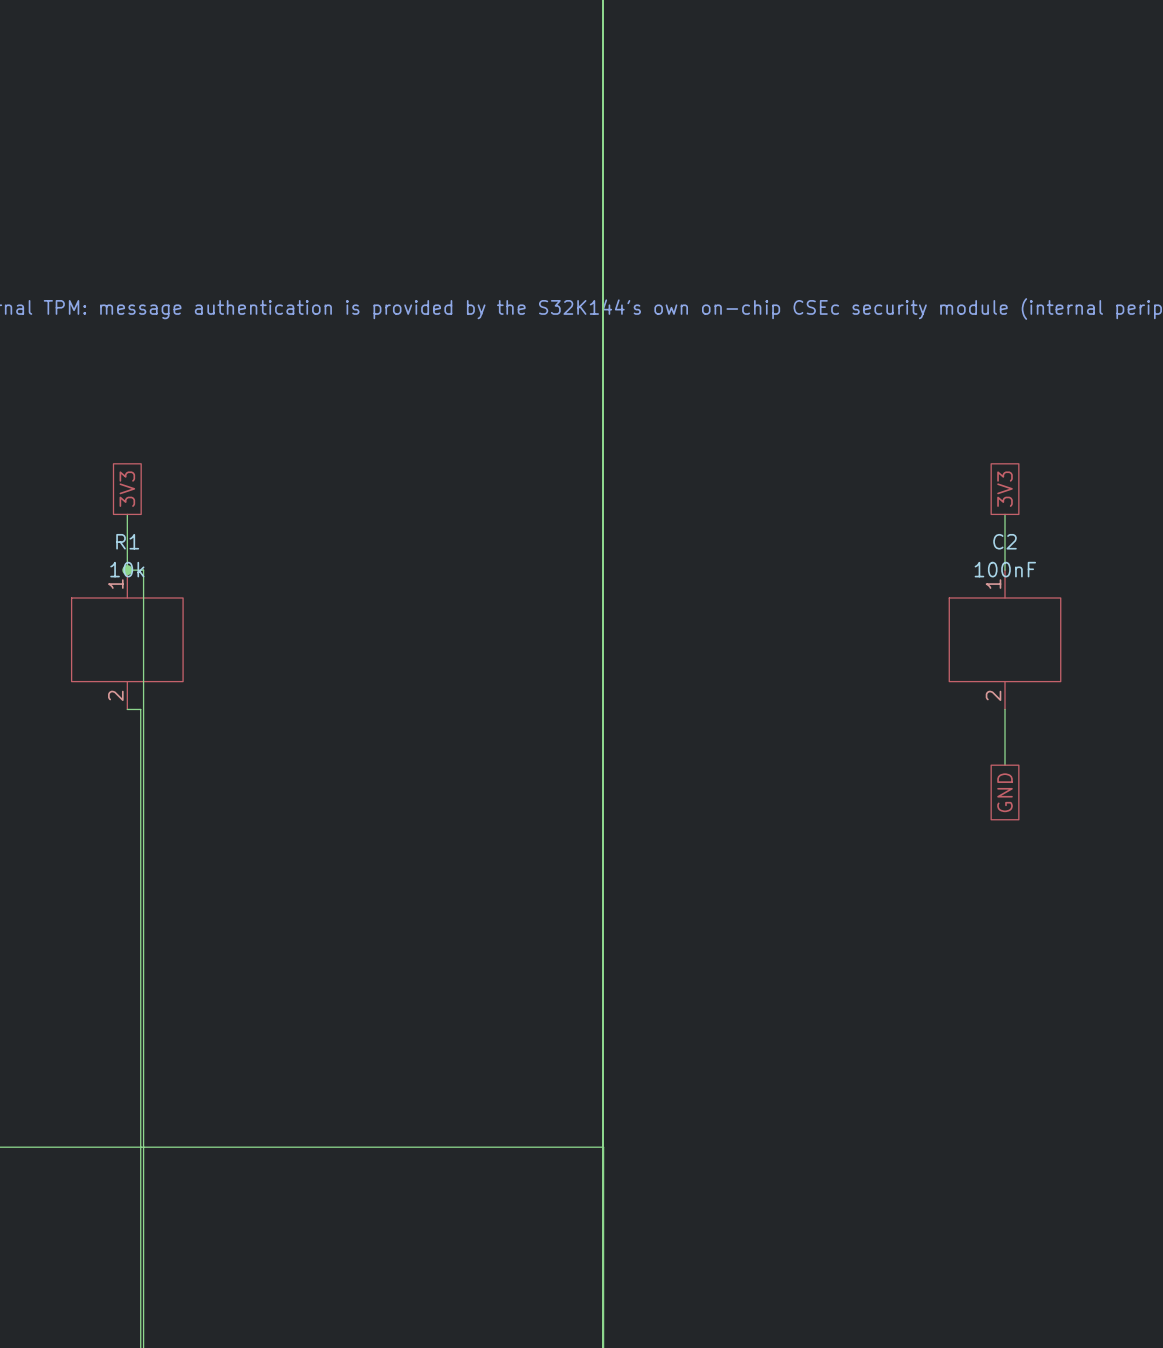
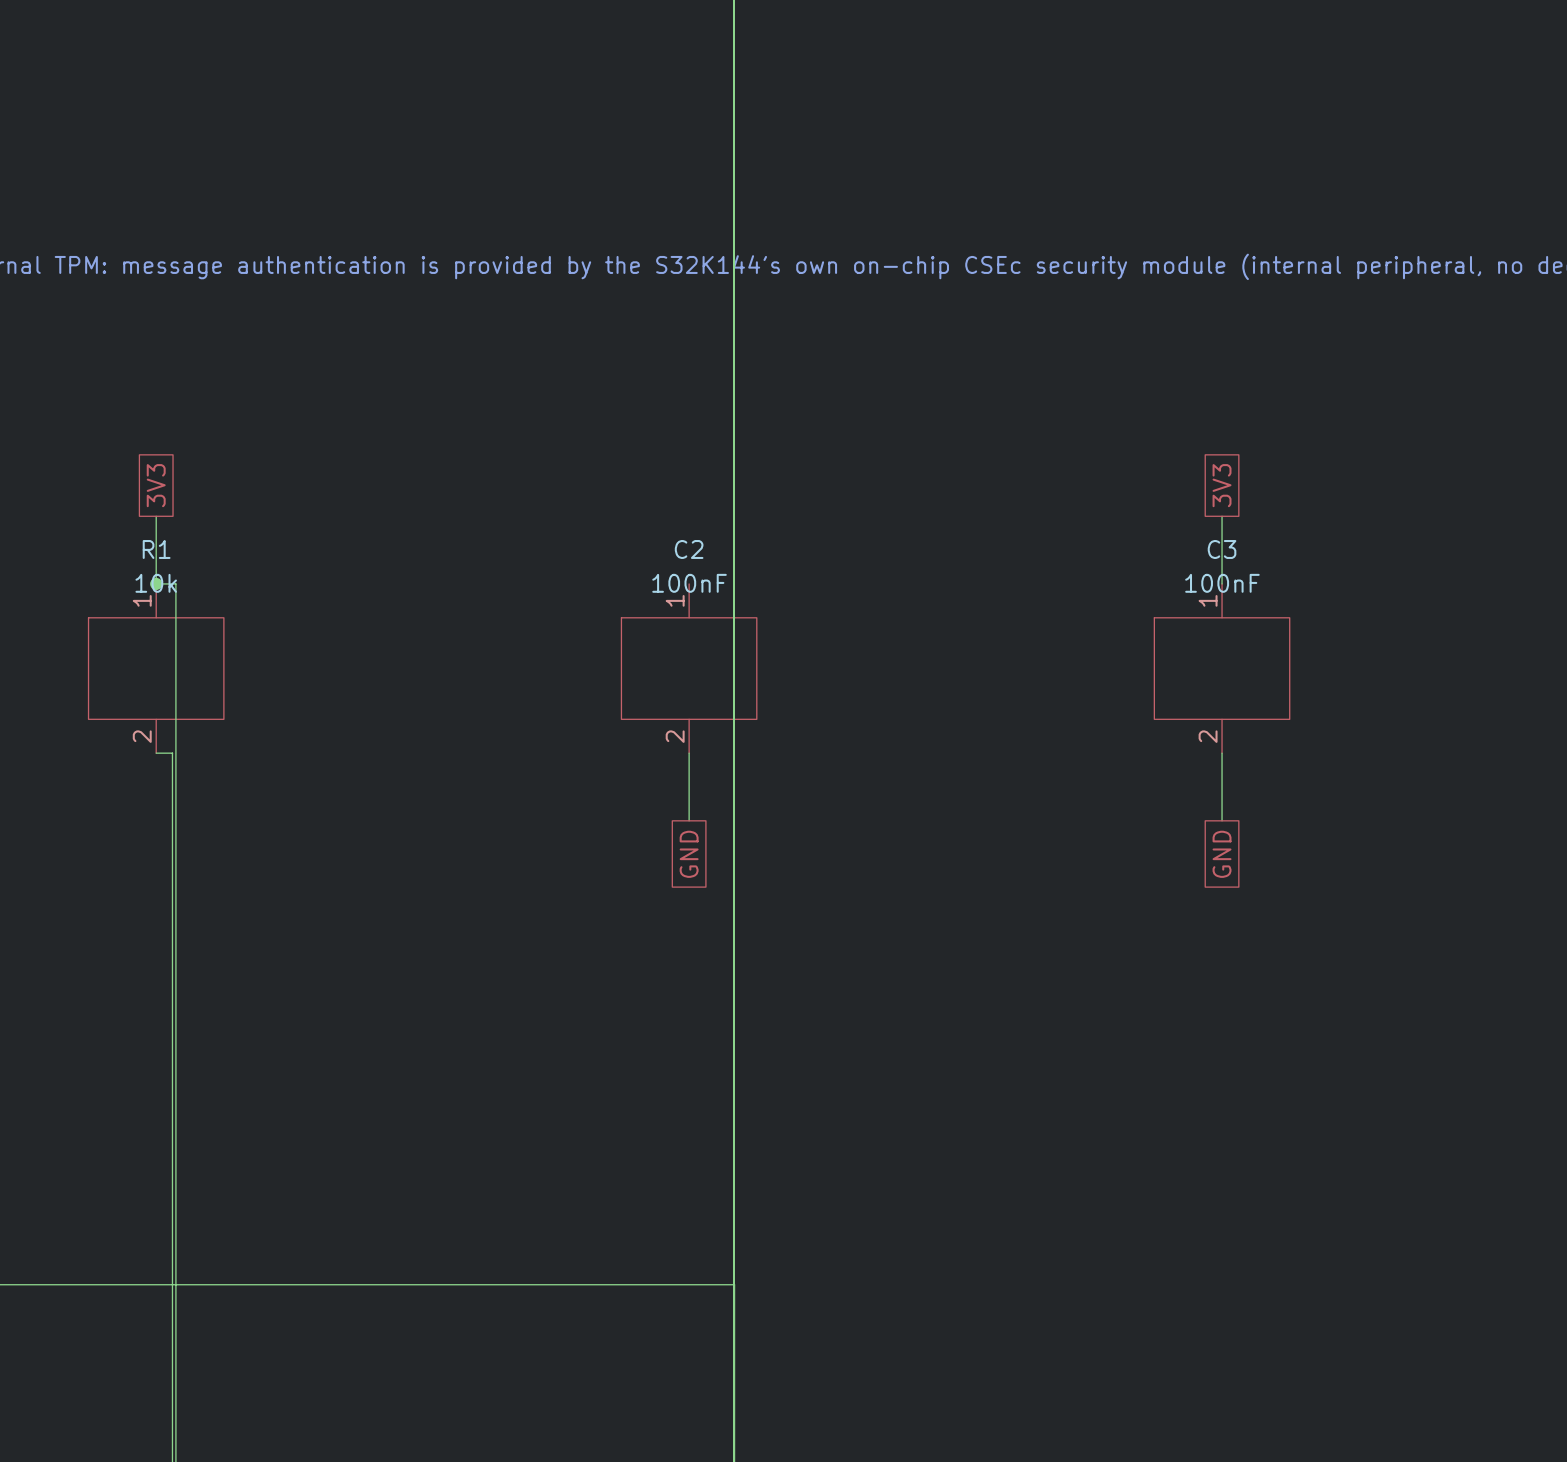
C2 name: C2 (1005, 541) -> C3 (1222, 549)
C2: none -> 100nF (689, 668)
wire: none -> (689, 753) (689, 820)
global label: none -> GND (689, 854)

